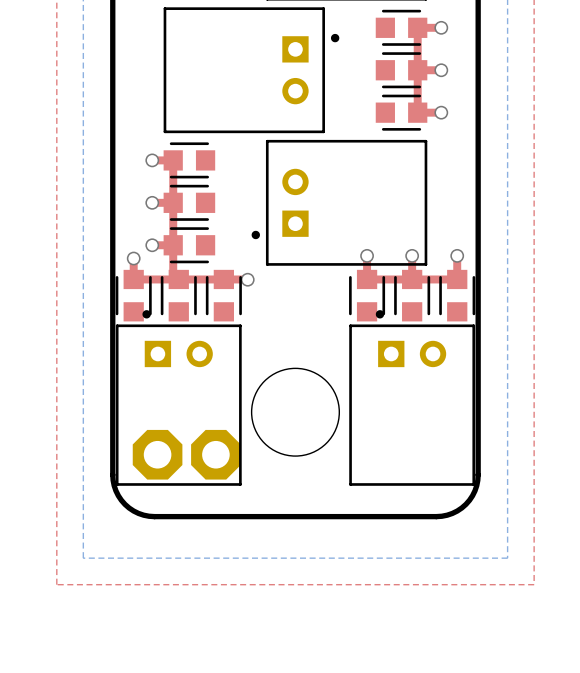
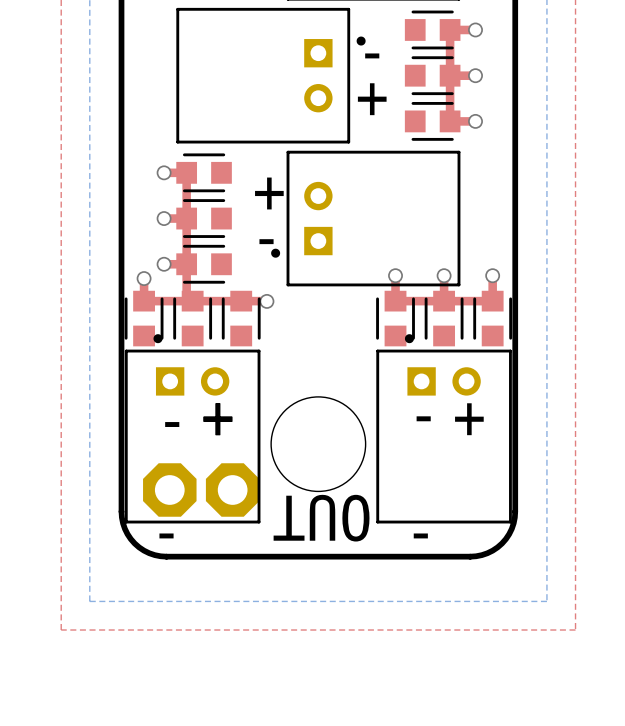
text: none -> - (372, 55)
text: none -> + (372, 99)
text: none -> + (269, 193)
text: none -> - (266, 241)
text: none -> - (423, 418)
text: none -> + (217, 419)
text: none -> + (469, 419)
text: none -> - (172, 424)
text: none -> OUT (321, 518)
text: none -> - (166, 535)
text: none -> - (420, 535)

